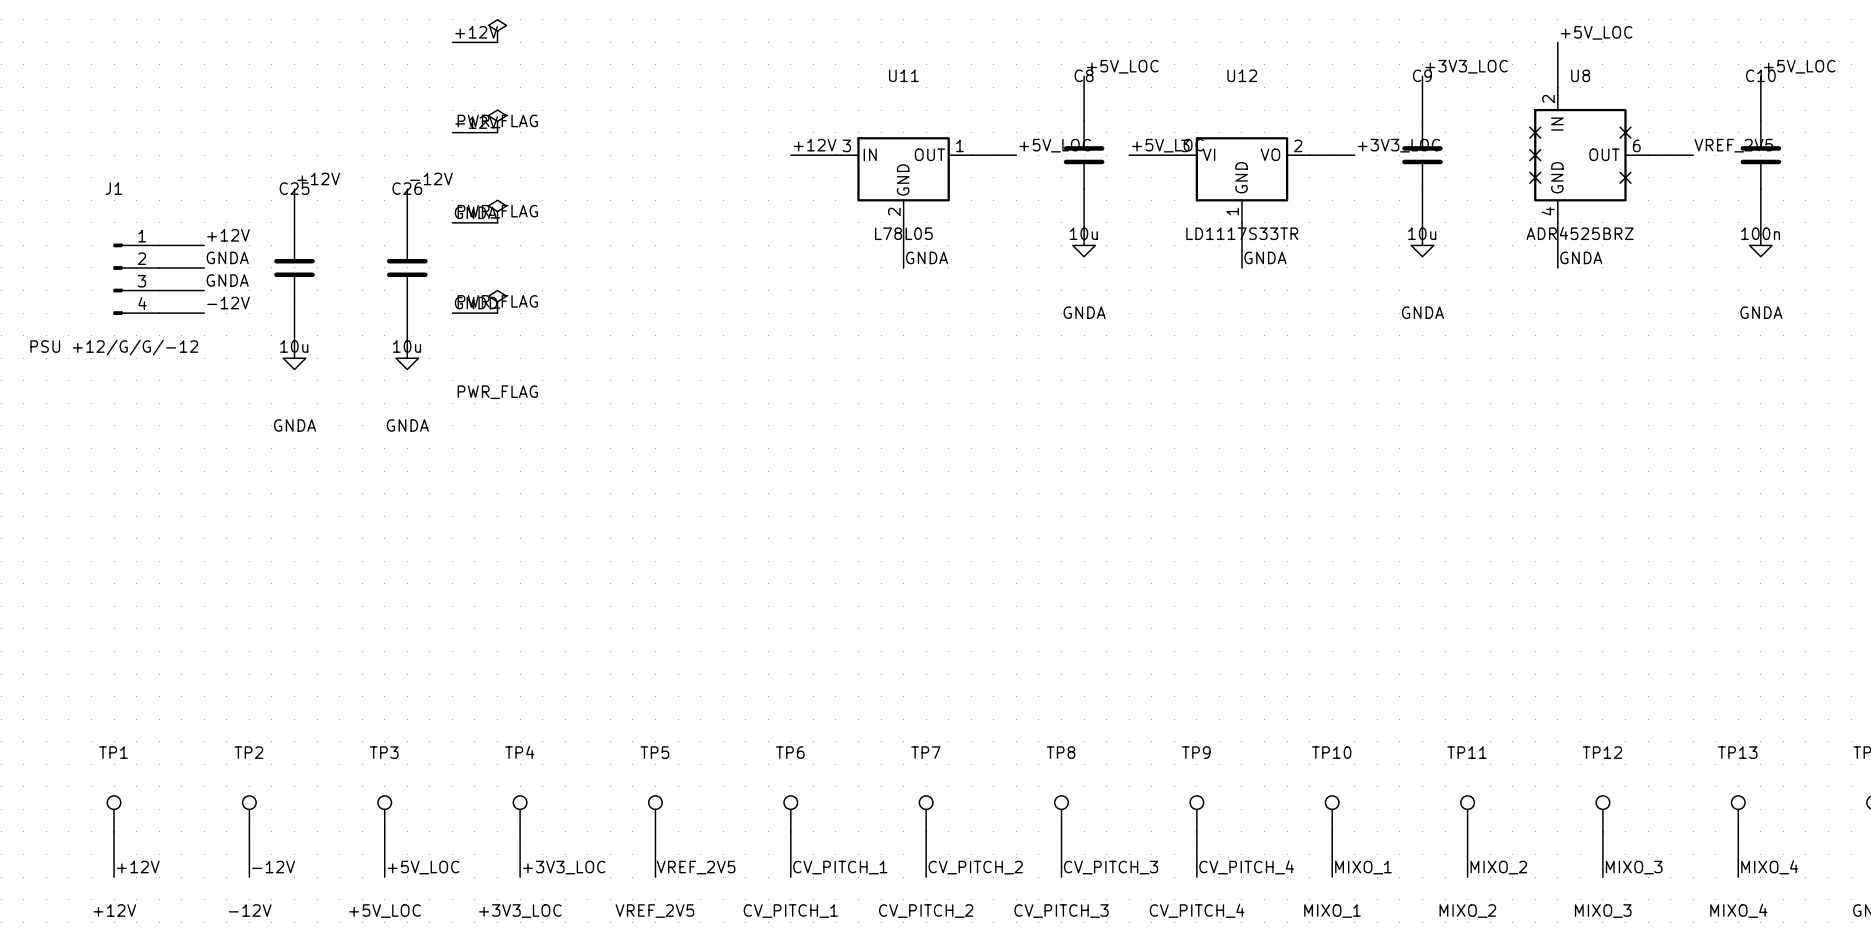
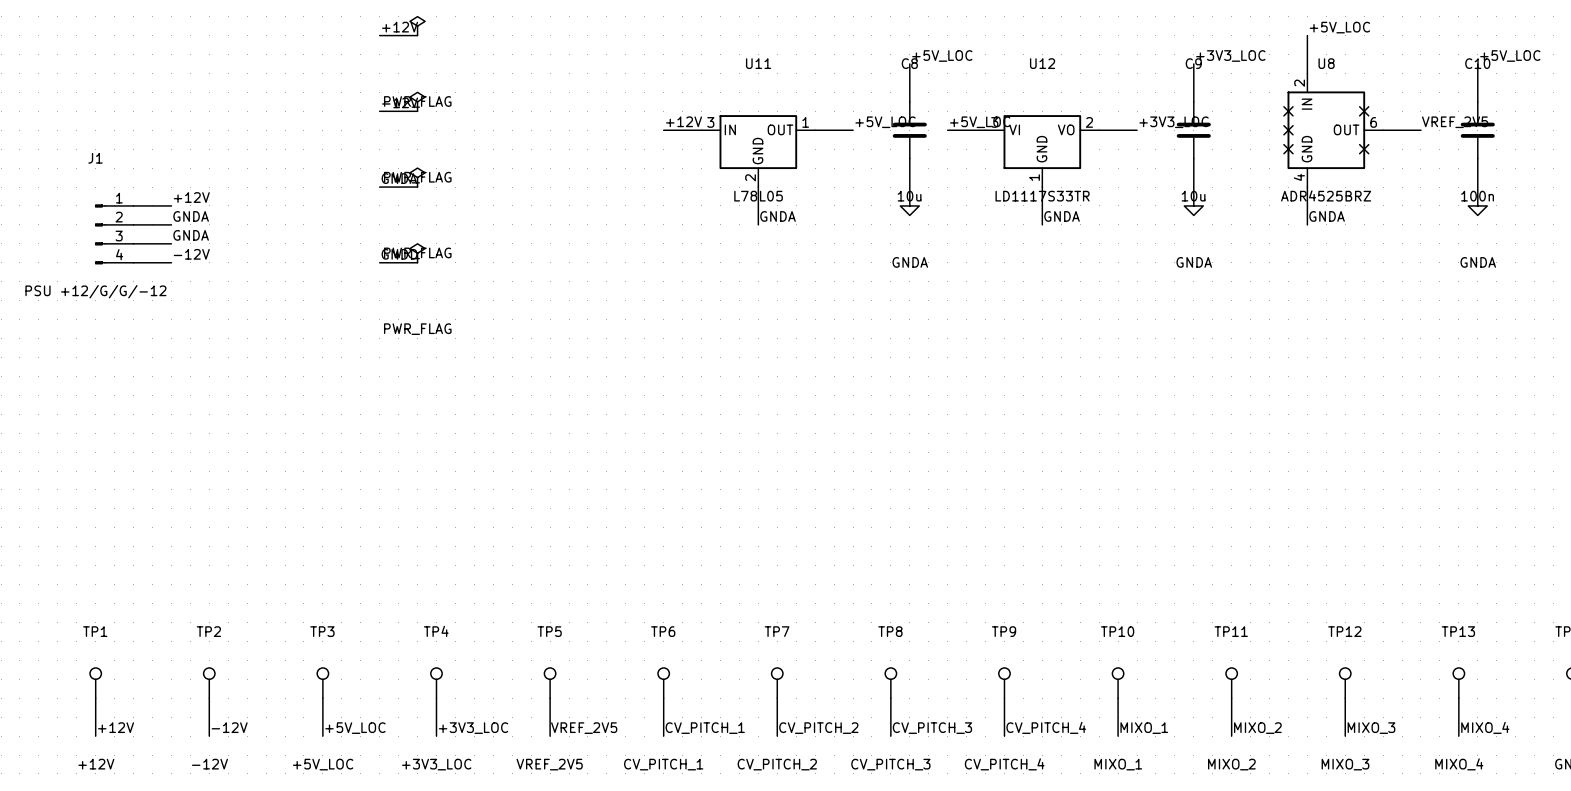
label: +12V (318, 178) -> none
label: -12V (431, 178) -> none
wire: (294, 189) (294, 234) -> none
wire: (407, 189) (407, 234) -> none
C25: 10u (294, 267) -> none
C26: 10u (407, 267) -> none
wire: (294, 301) (294, 346) -> none
wire: (407, 301) (407, 346) -> none
power symbol: GNDA (294, 358) -> none
power symbol: GNDA (407, 358) -> none

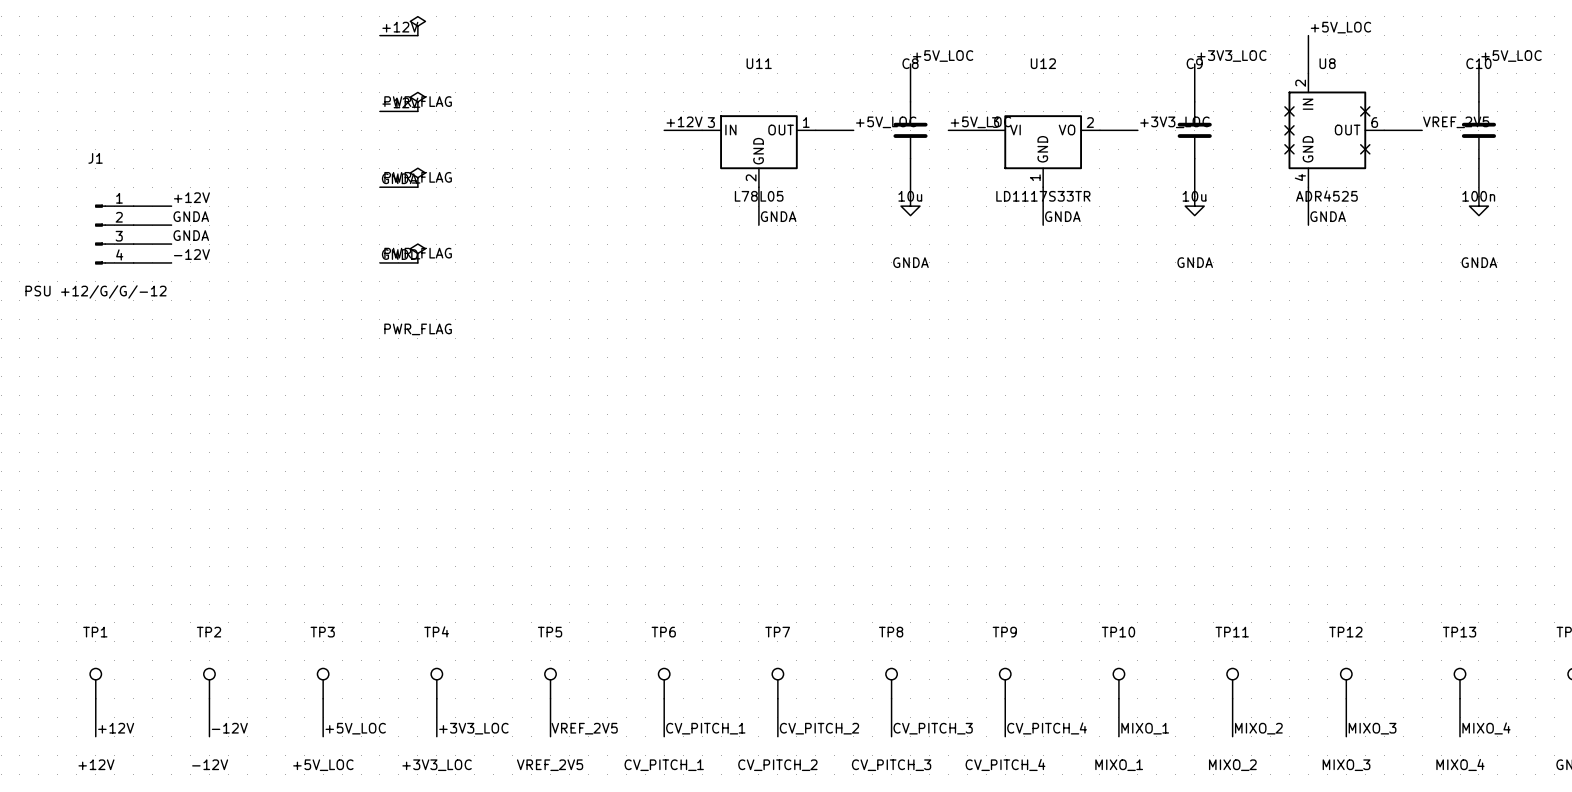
U8 value: ADR4525BRZ (1326, 195) -> ADR4525 (1326, 196)

